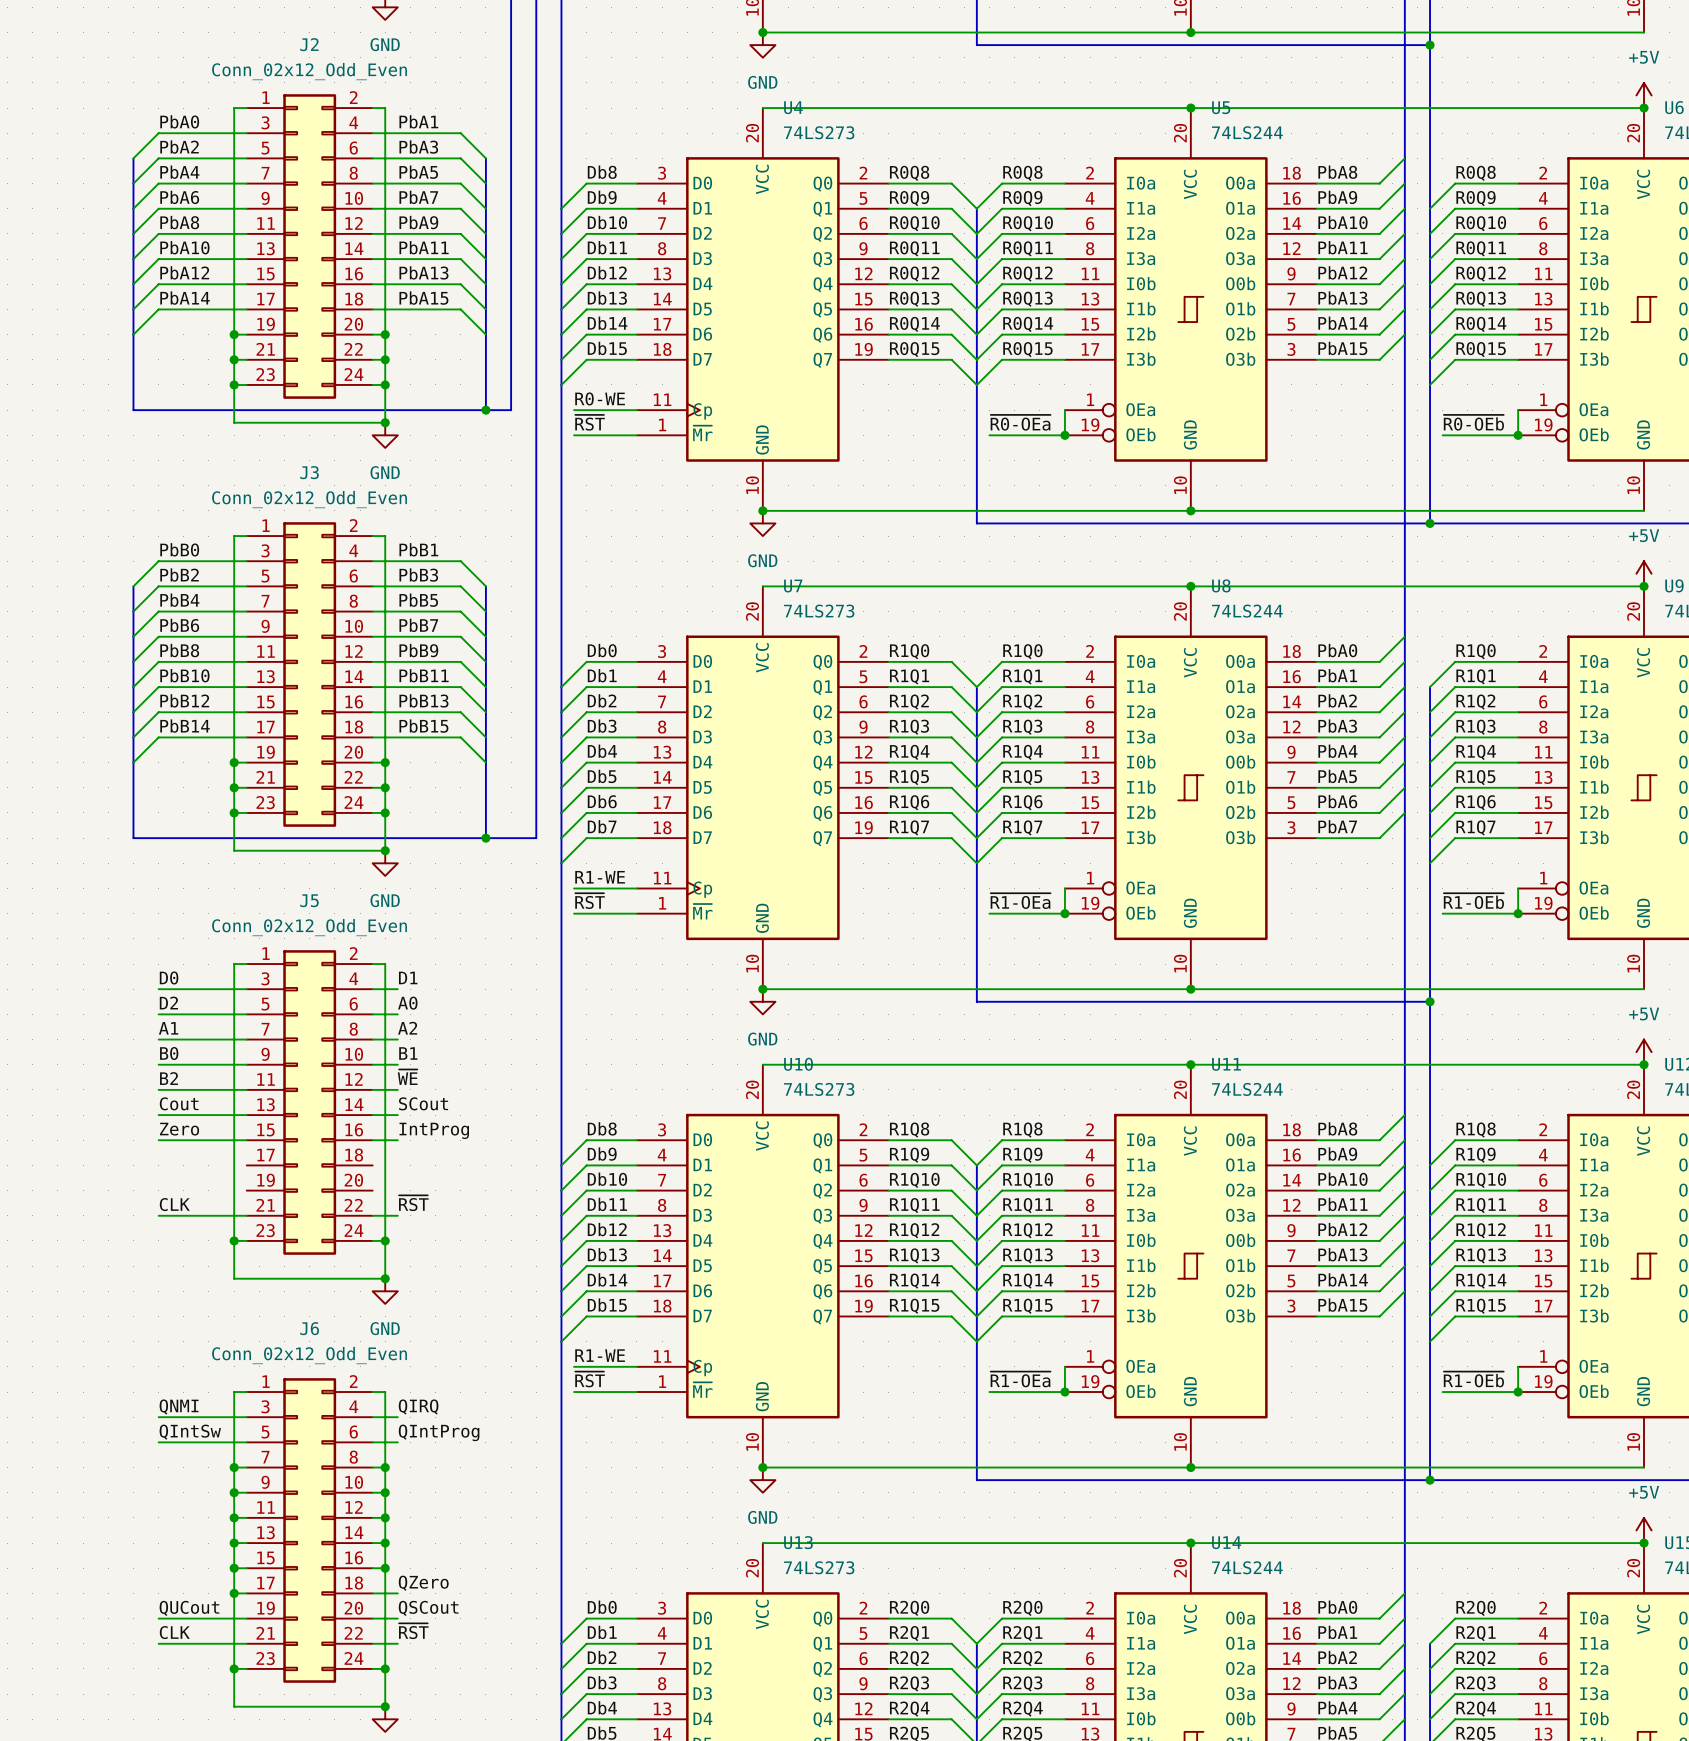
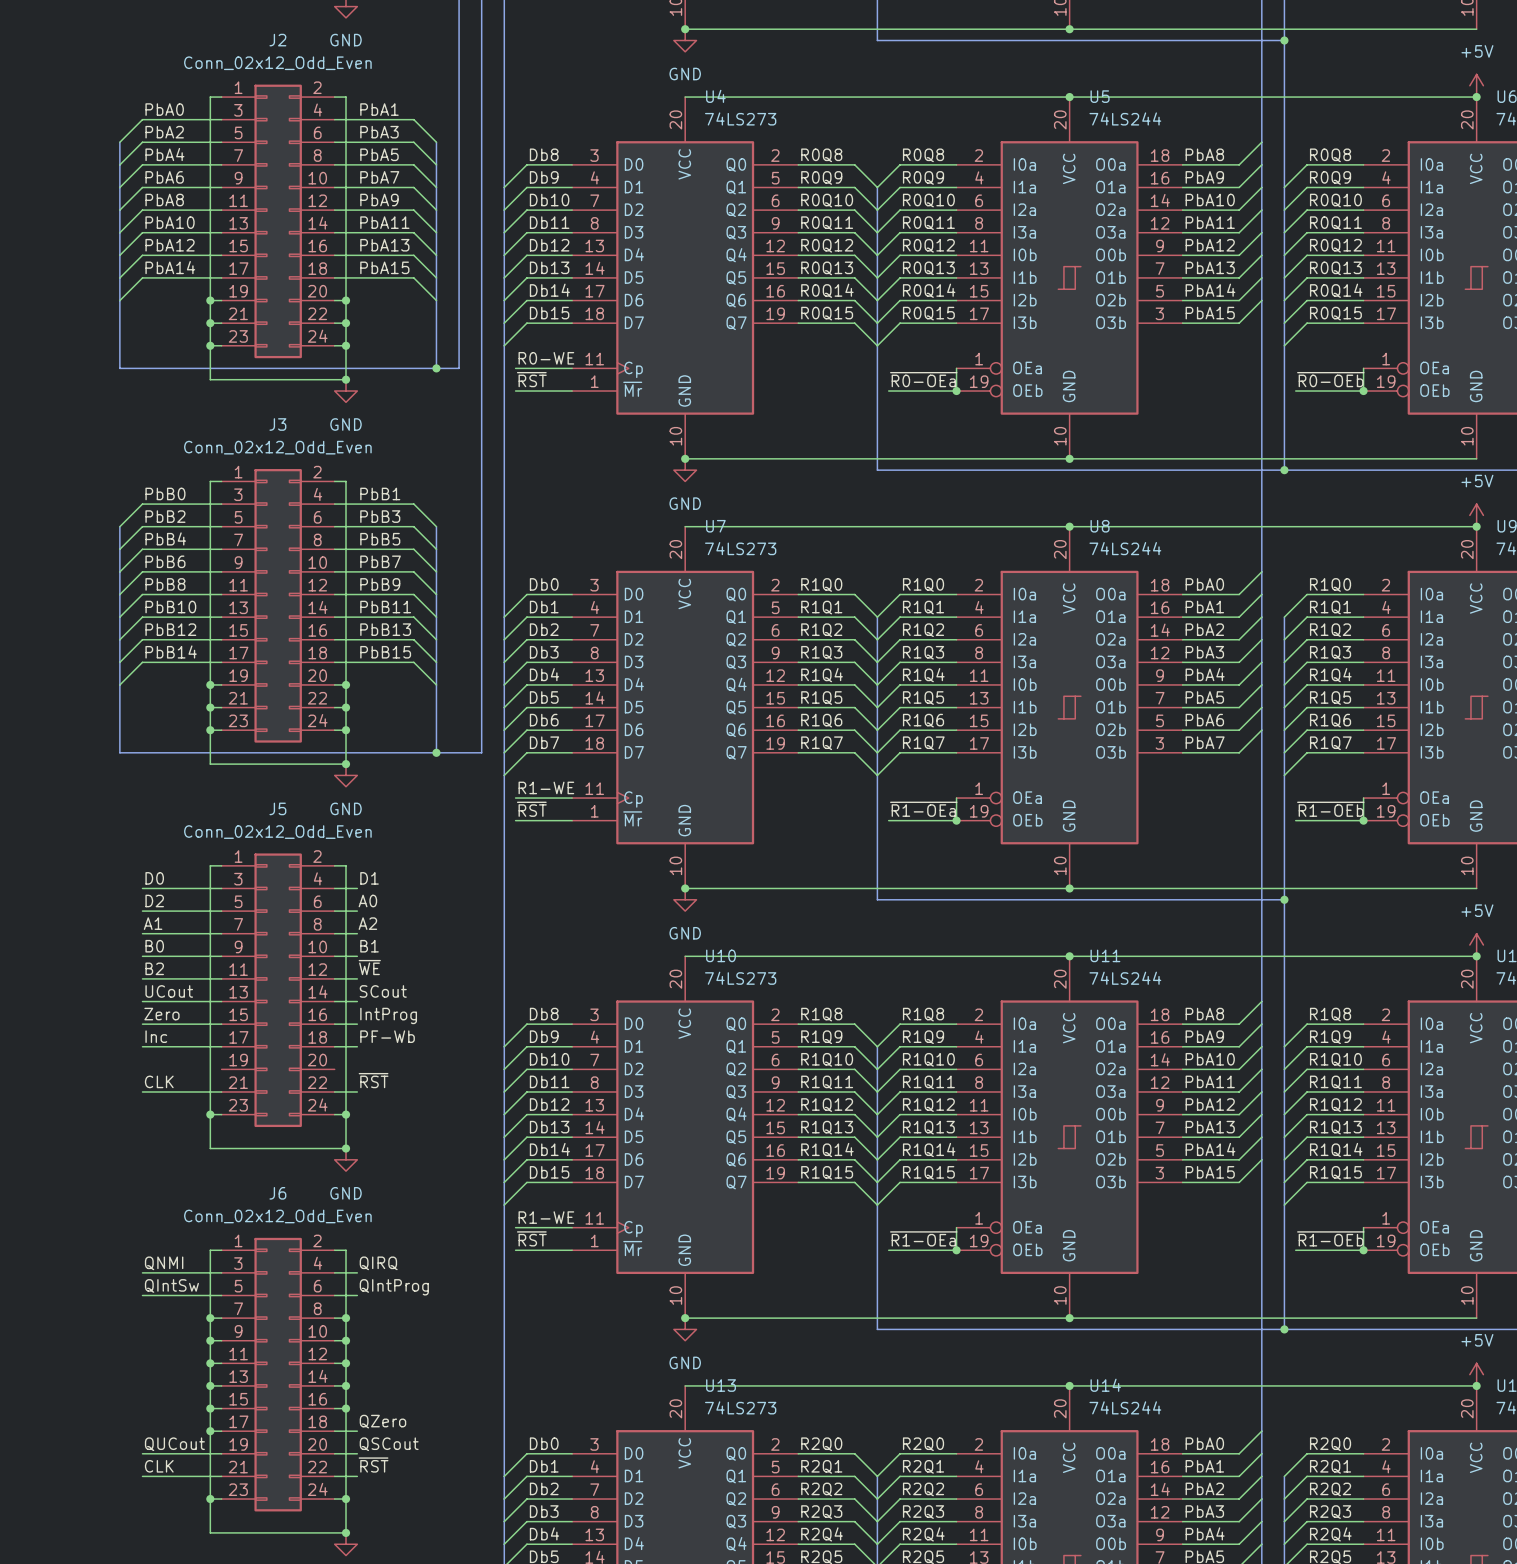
label: Cout (179, 1103) -> UCout (169, 991)
label: none -> Inc (156, 1036)
label: none -> PF-Wb (387, 1036)
wire: none -> (142, 1046) (221, 1046)
wire: none -> (334, 1046) (357, 1046)

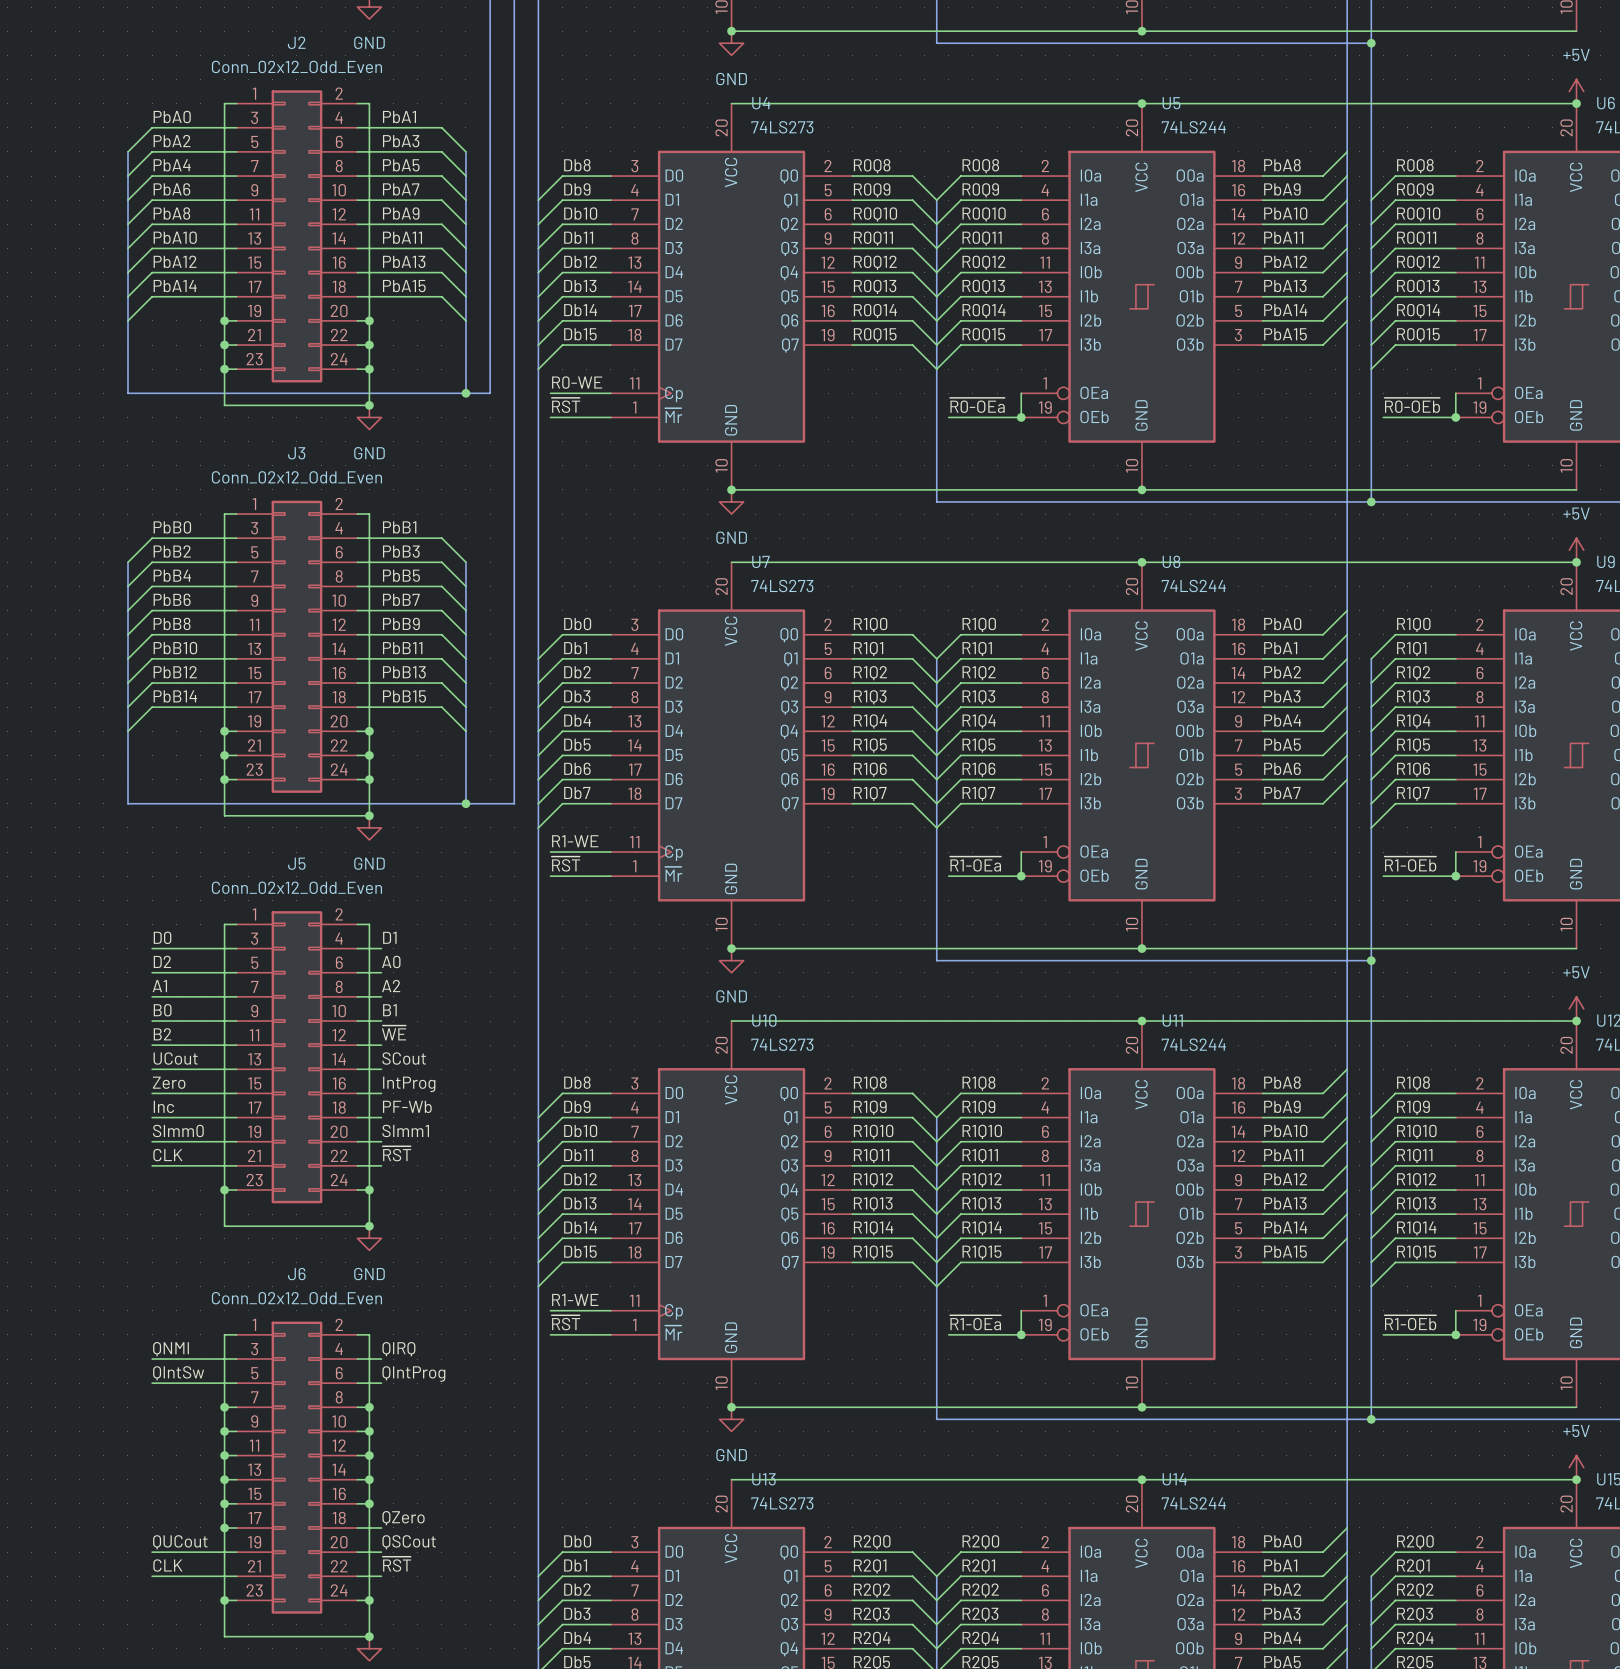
label: none -> SImm0 (178, 1130)
label: none -> SImm1 (405, 1130)
wire: none -> (152, 1141) (236, 1141)
wire: none -> (357, 1141) (381, 1141)

